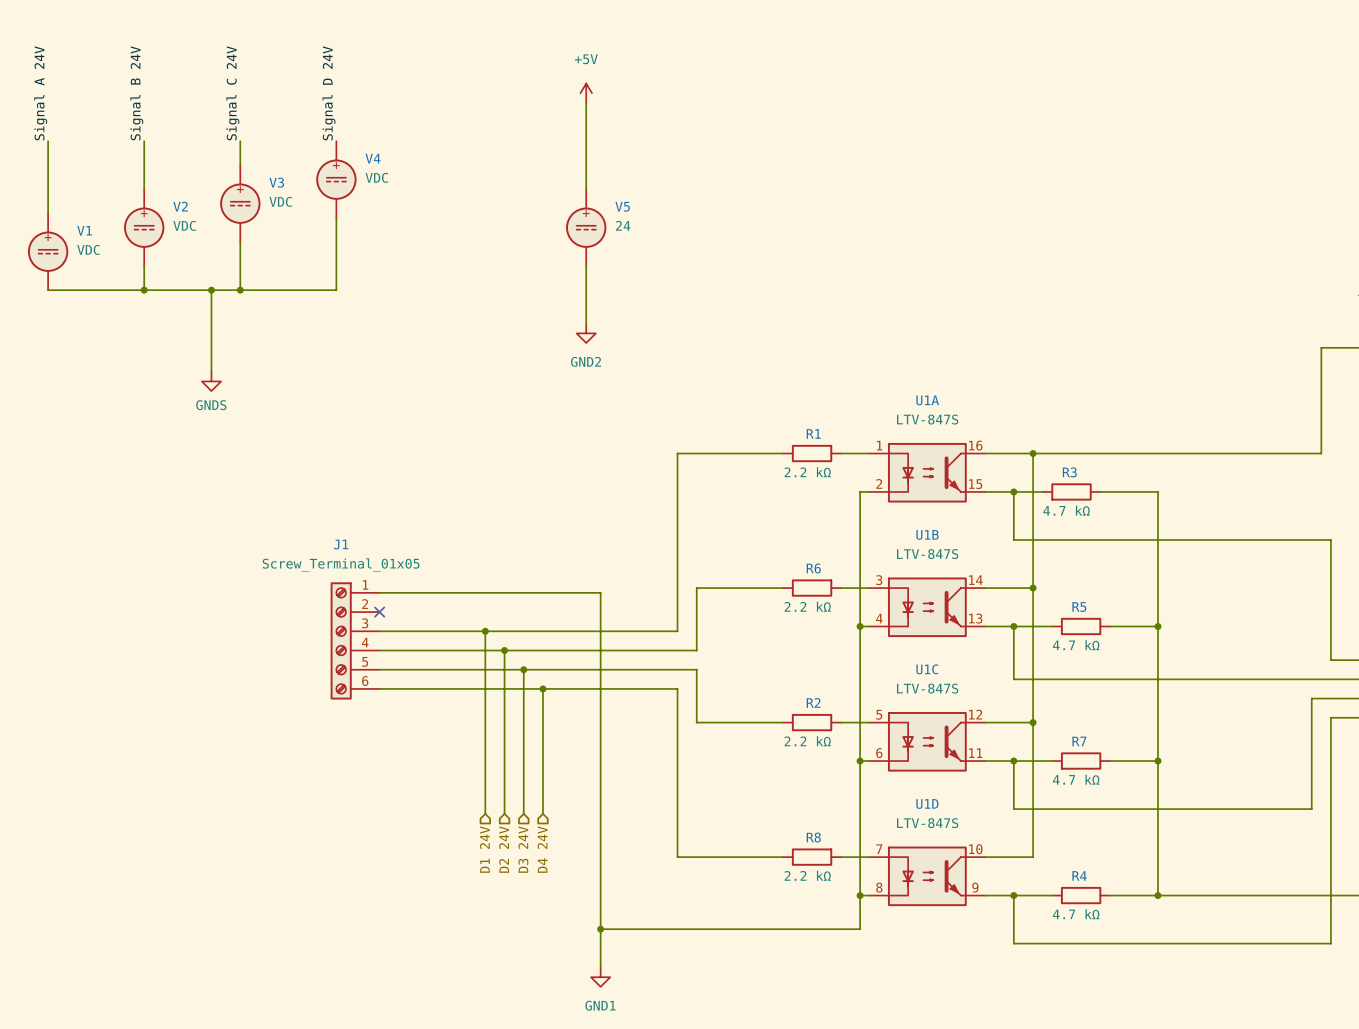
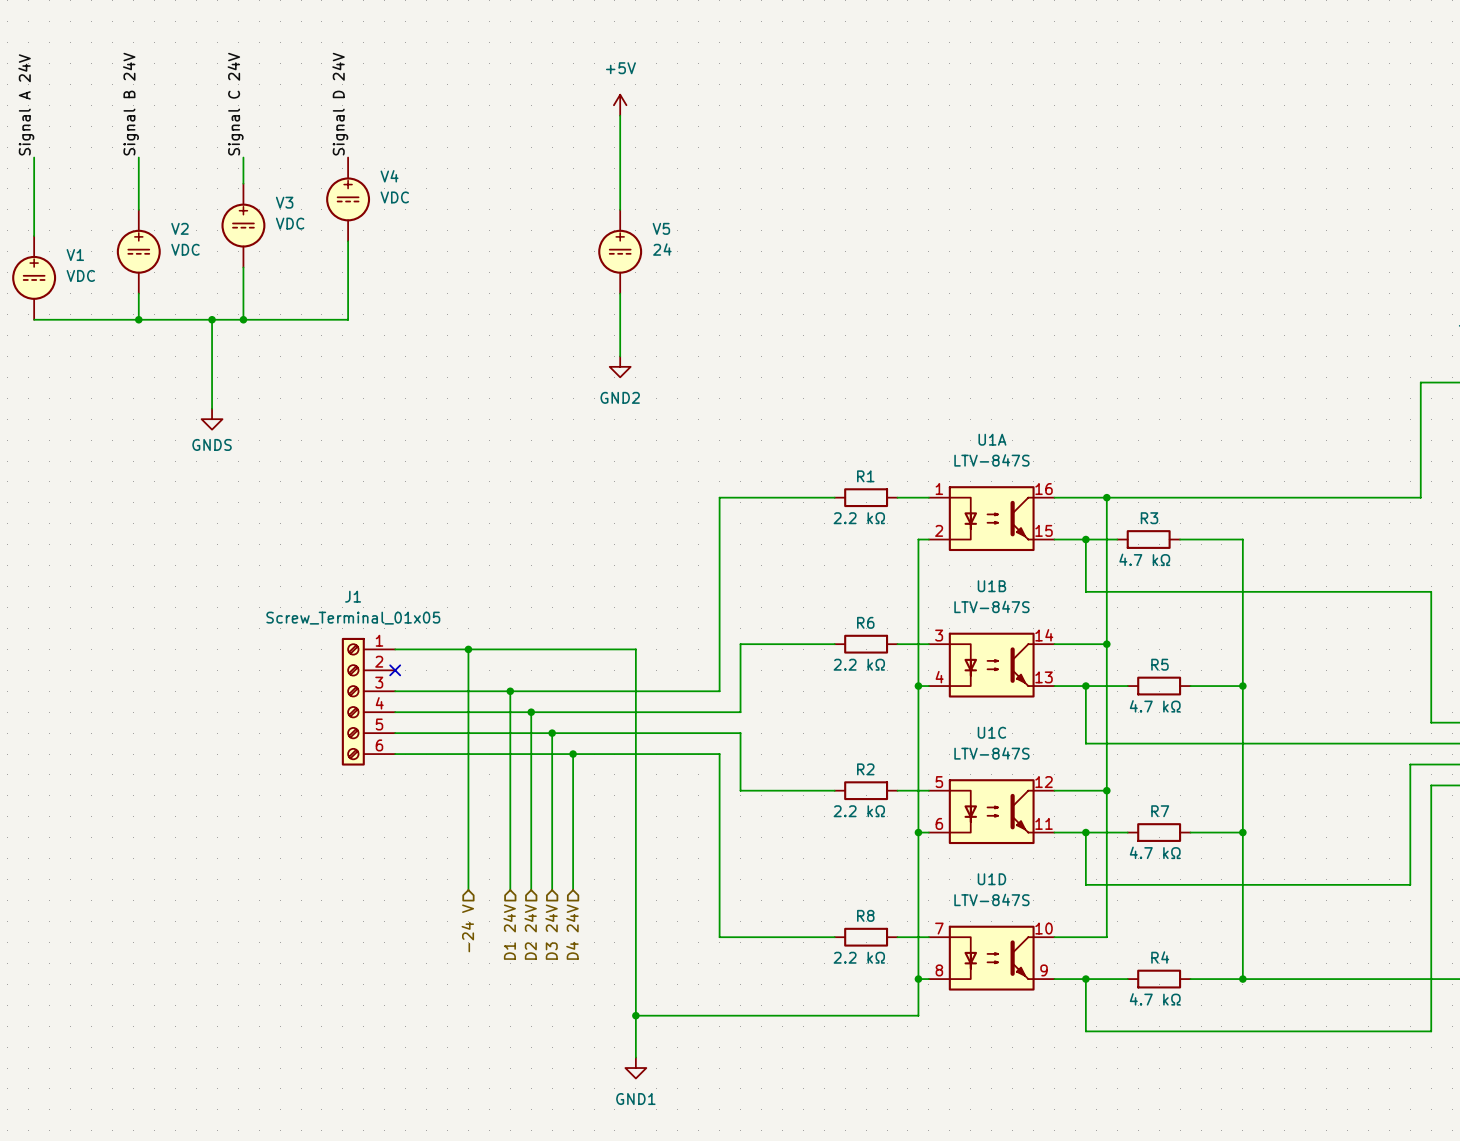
wire: none -> (468, 649) (468, 890)
junction: none -> (468, 649)
hierarchical label: none -> -24 V (467, 928)

